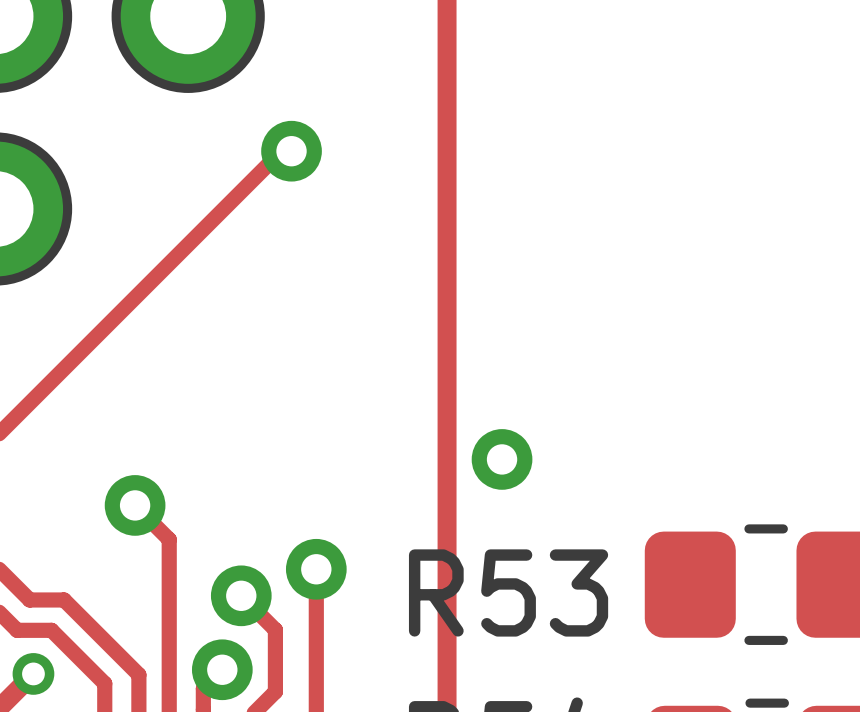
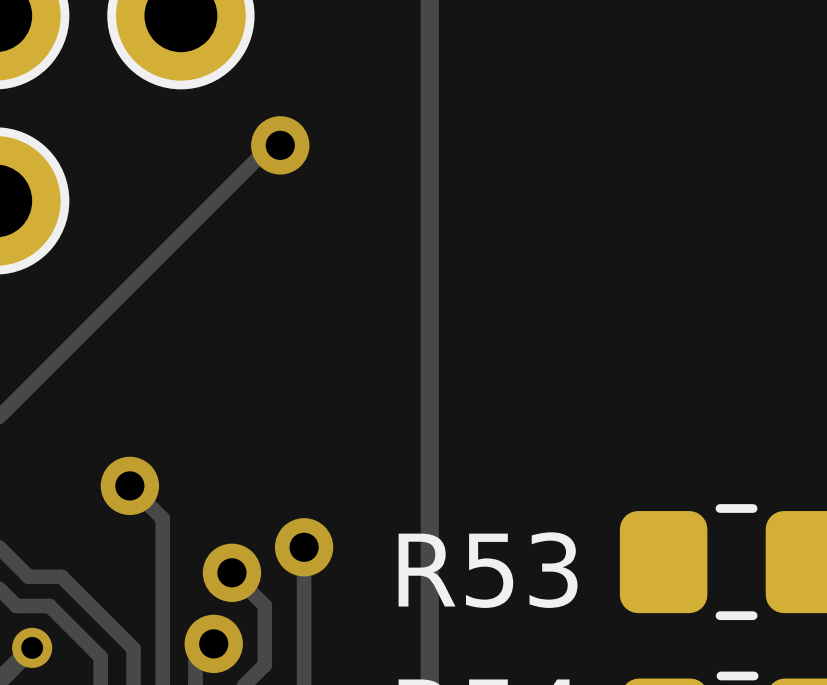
via: (502, 459) -> none

